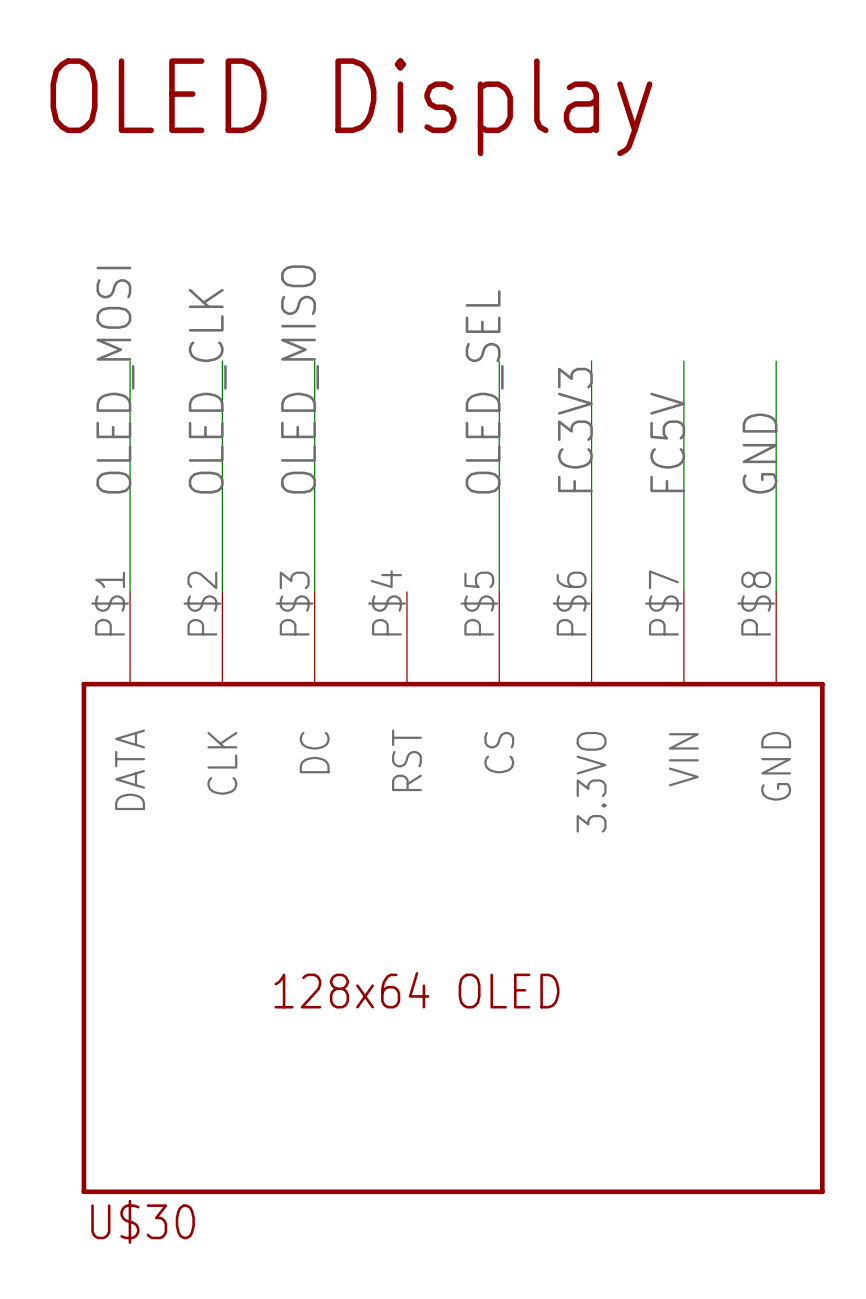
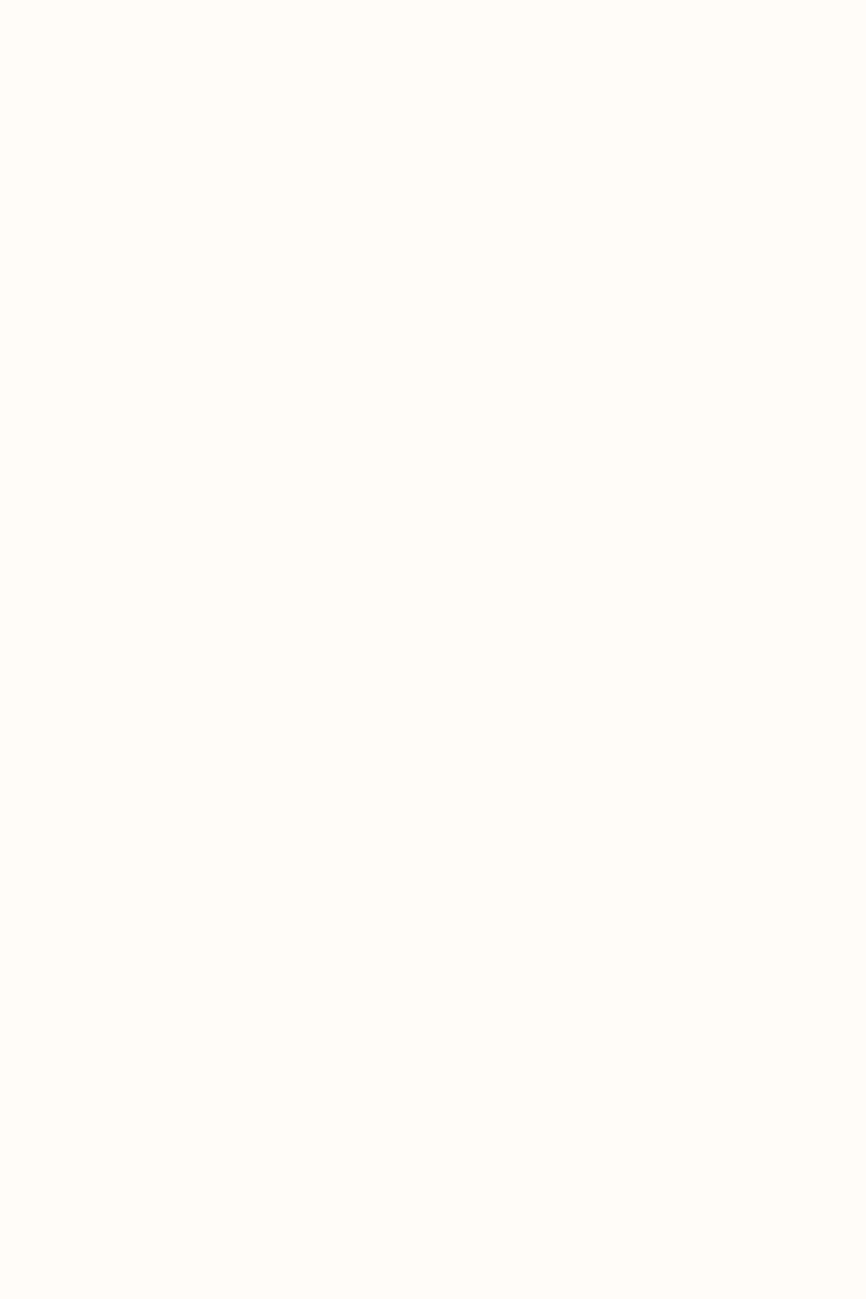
text: OLED Display (351, 107) -> none
wire: (130, 361) (130, 591) -> none
wire: (222, 361) (222, 591) -> none
wire: (314, 361) (314, 591) -> none
wire: (499, 361) (499, 591) -> none
wire: (591, 361) (591, 591) -> none
wire: (683, 361) (683, 591) -> none
wire: (776, 361) (776, 591) -> none
label: OLED_MISO (300, 379) -> none
label: OLED_MOSI (115, 380) -> none
label: OLED_CLK (207, 391) -> none
label: OLED_SEL (484, 391) -> none
label: FC3V3 (575, 429) -> none
label: FC5V (667, 442) -> none
label: GND (760, 453) -> none
U$30: (453, 892) -> none

